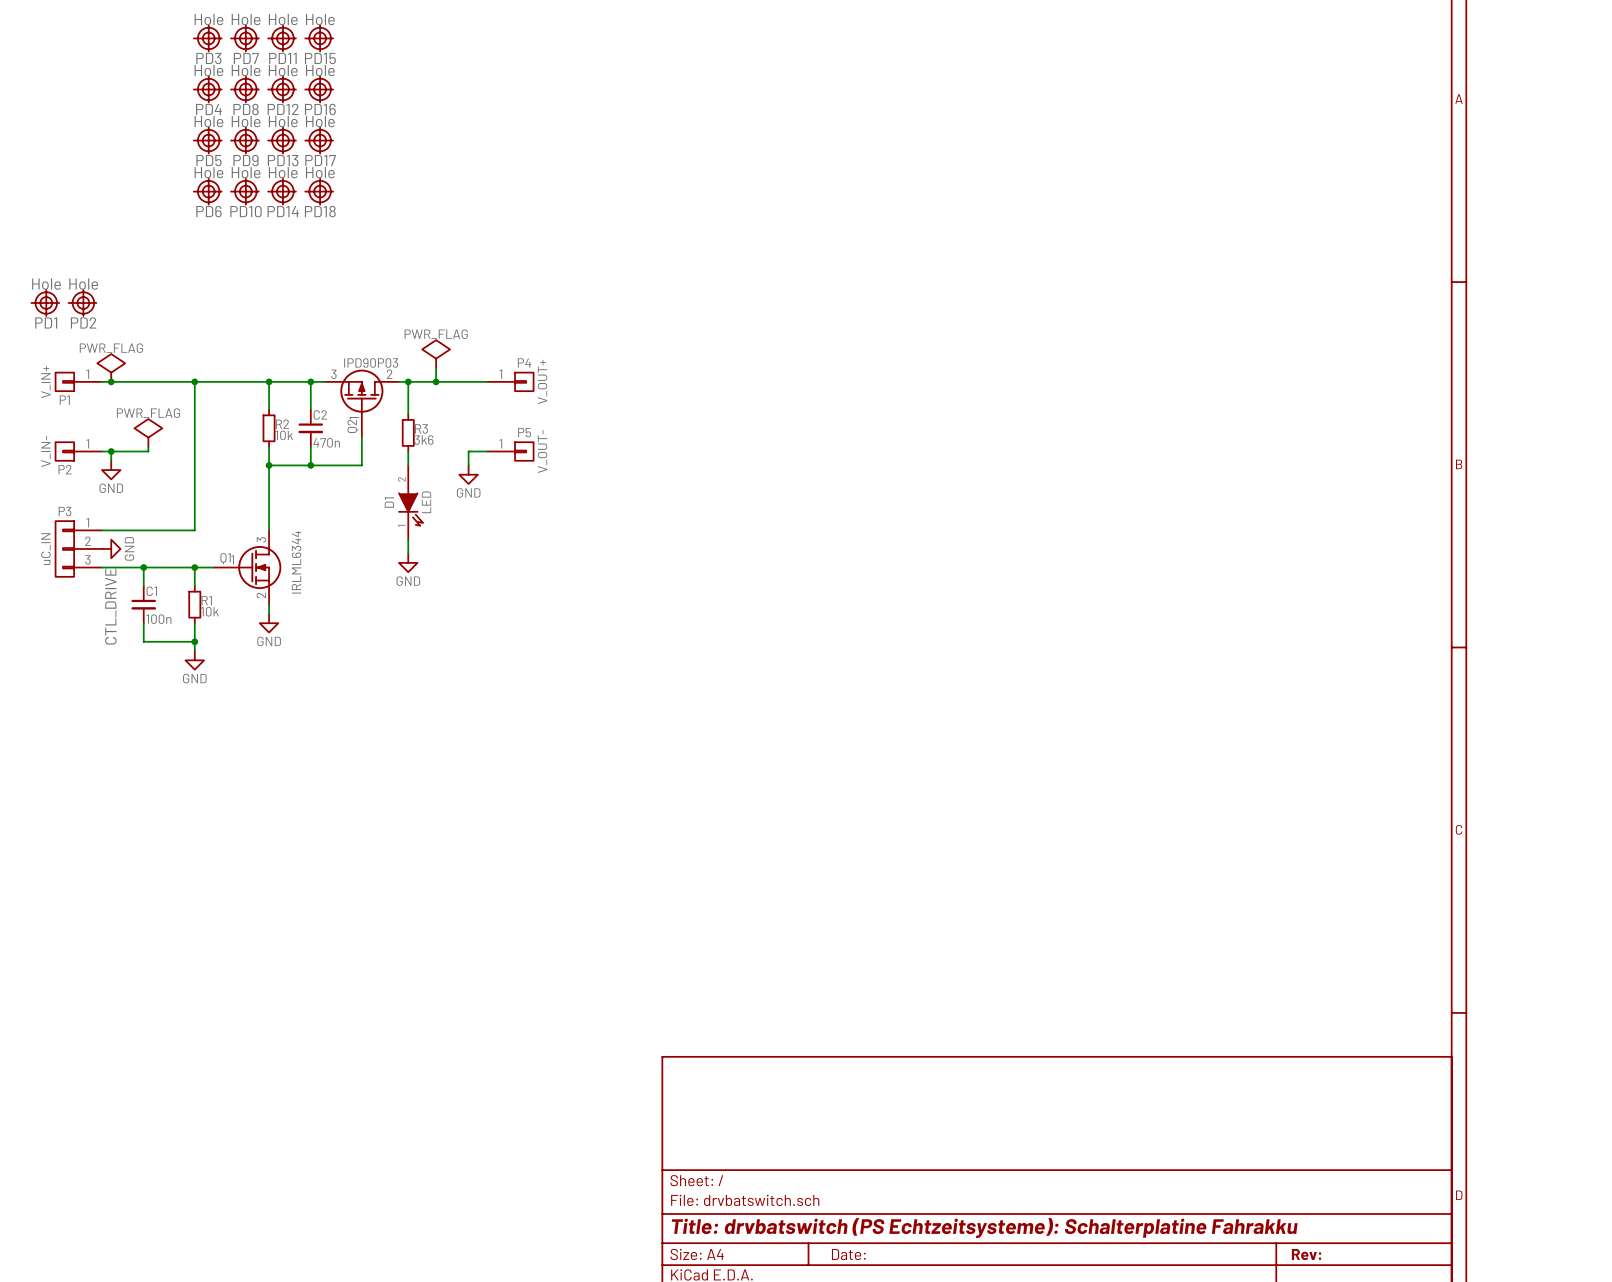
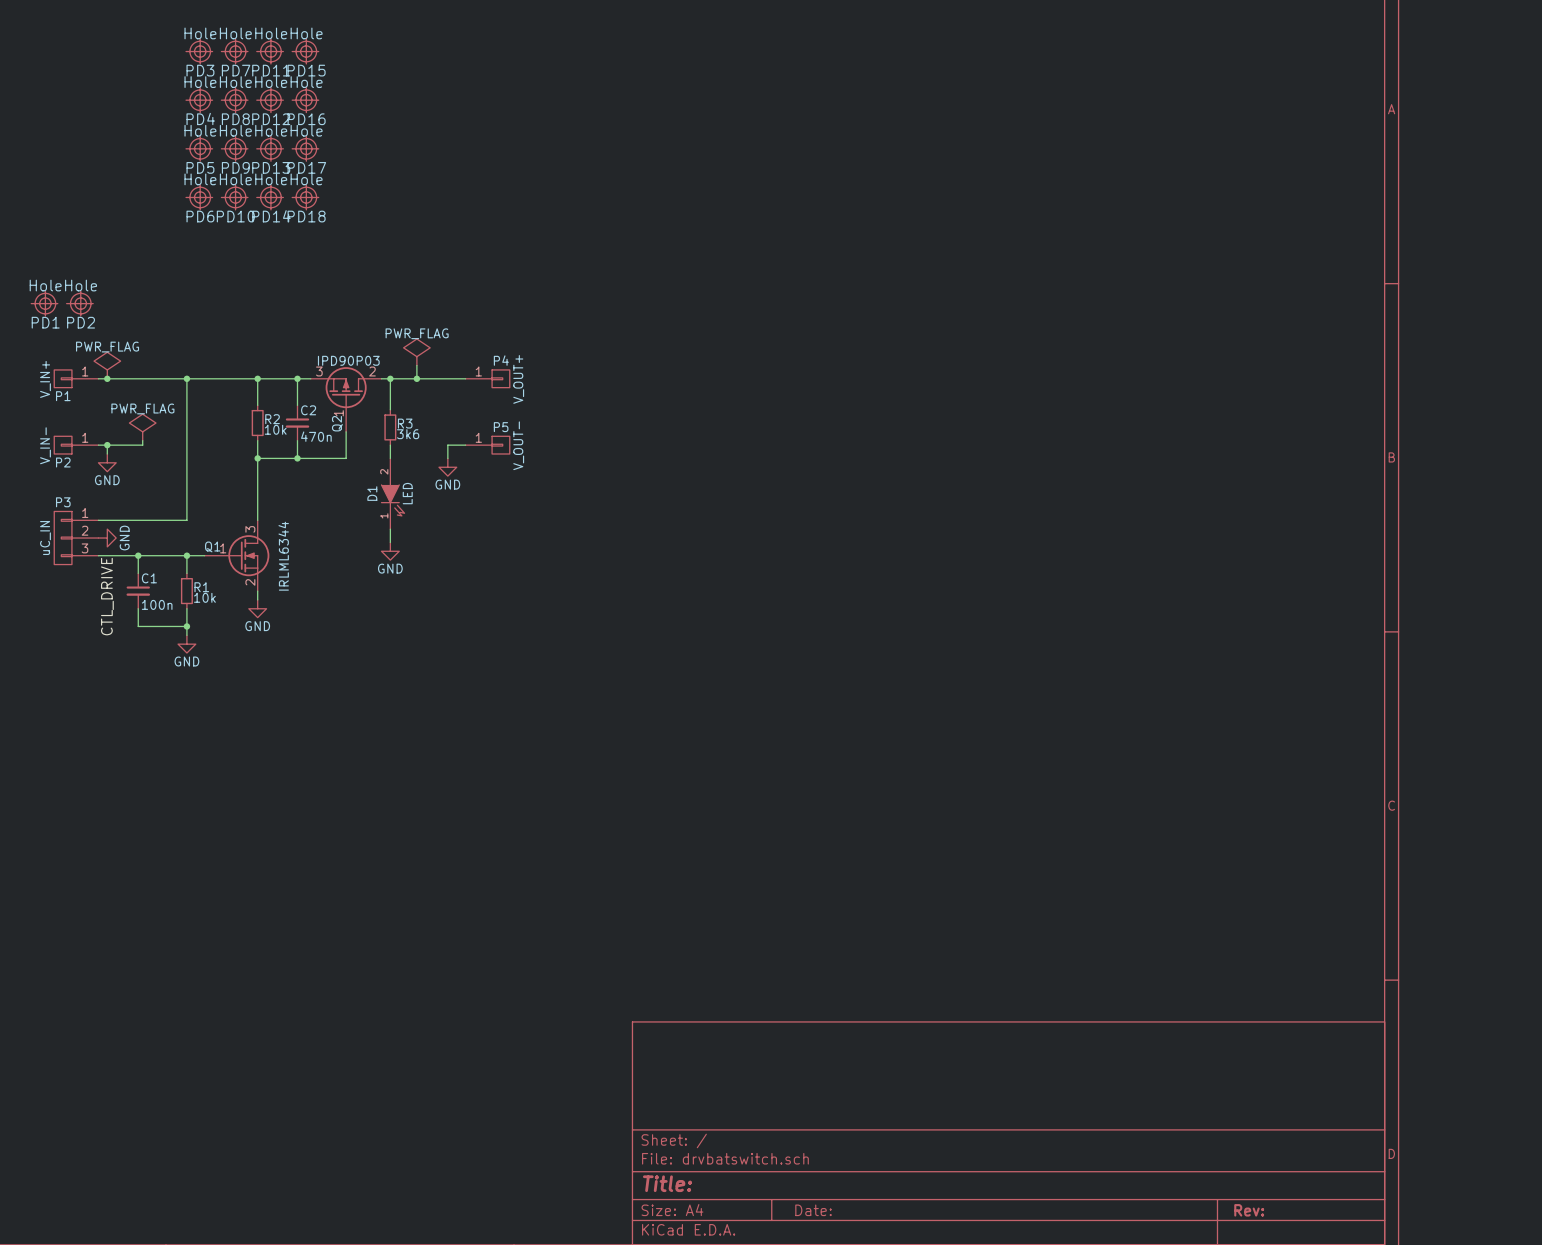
title block: Title: drvbatswitch (PS Echtzeitsysteme): Schalterplatine Fahrakku (984, 1228) -> Title: (667, 1183)

